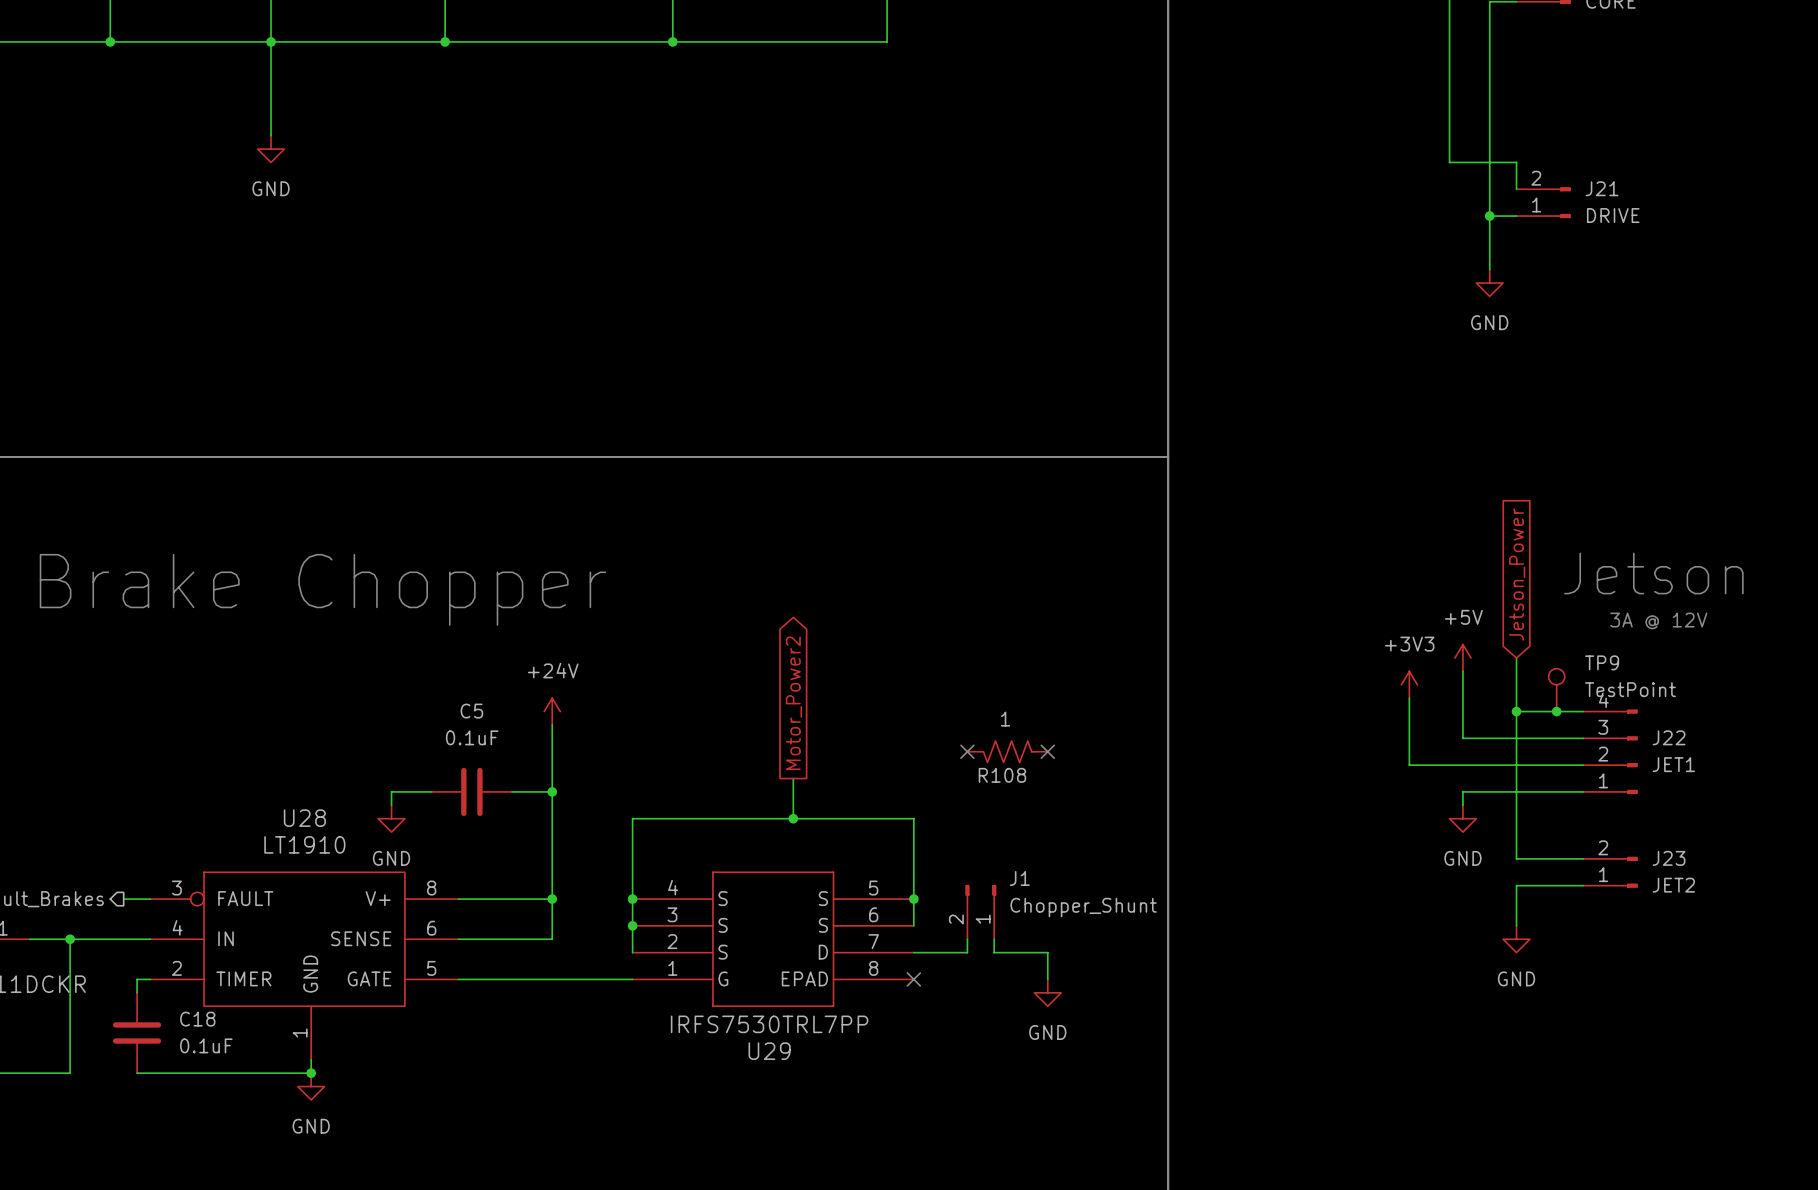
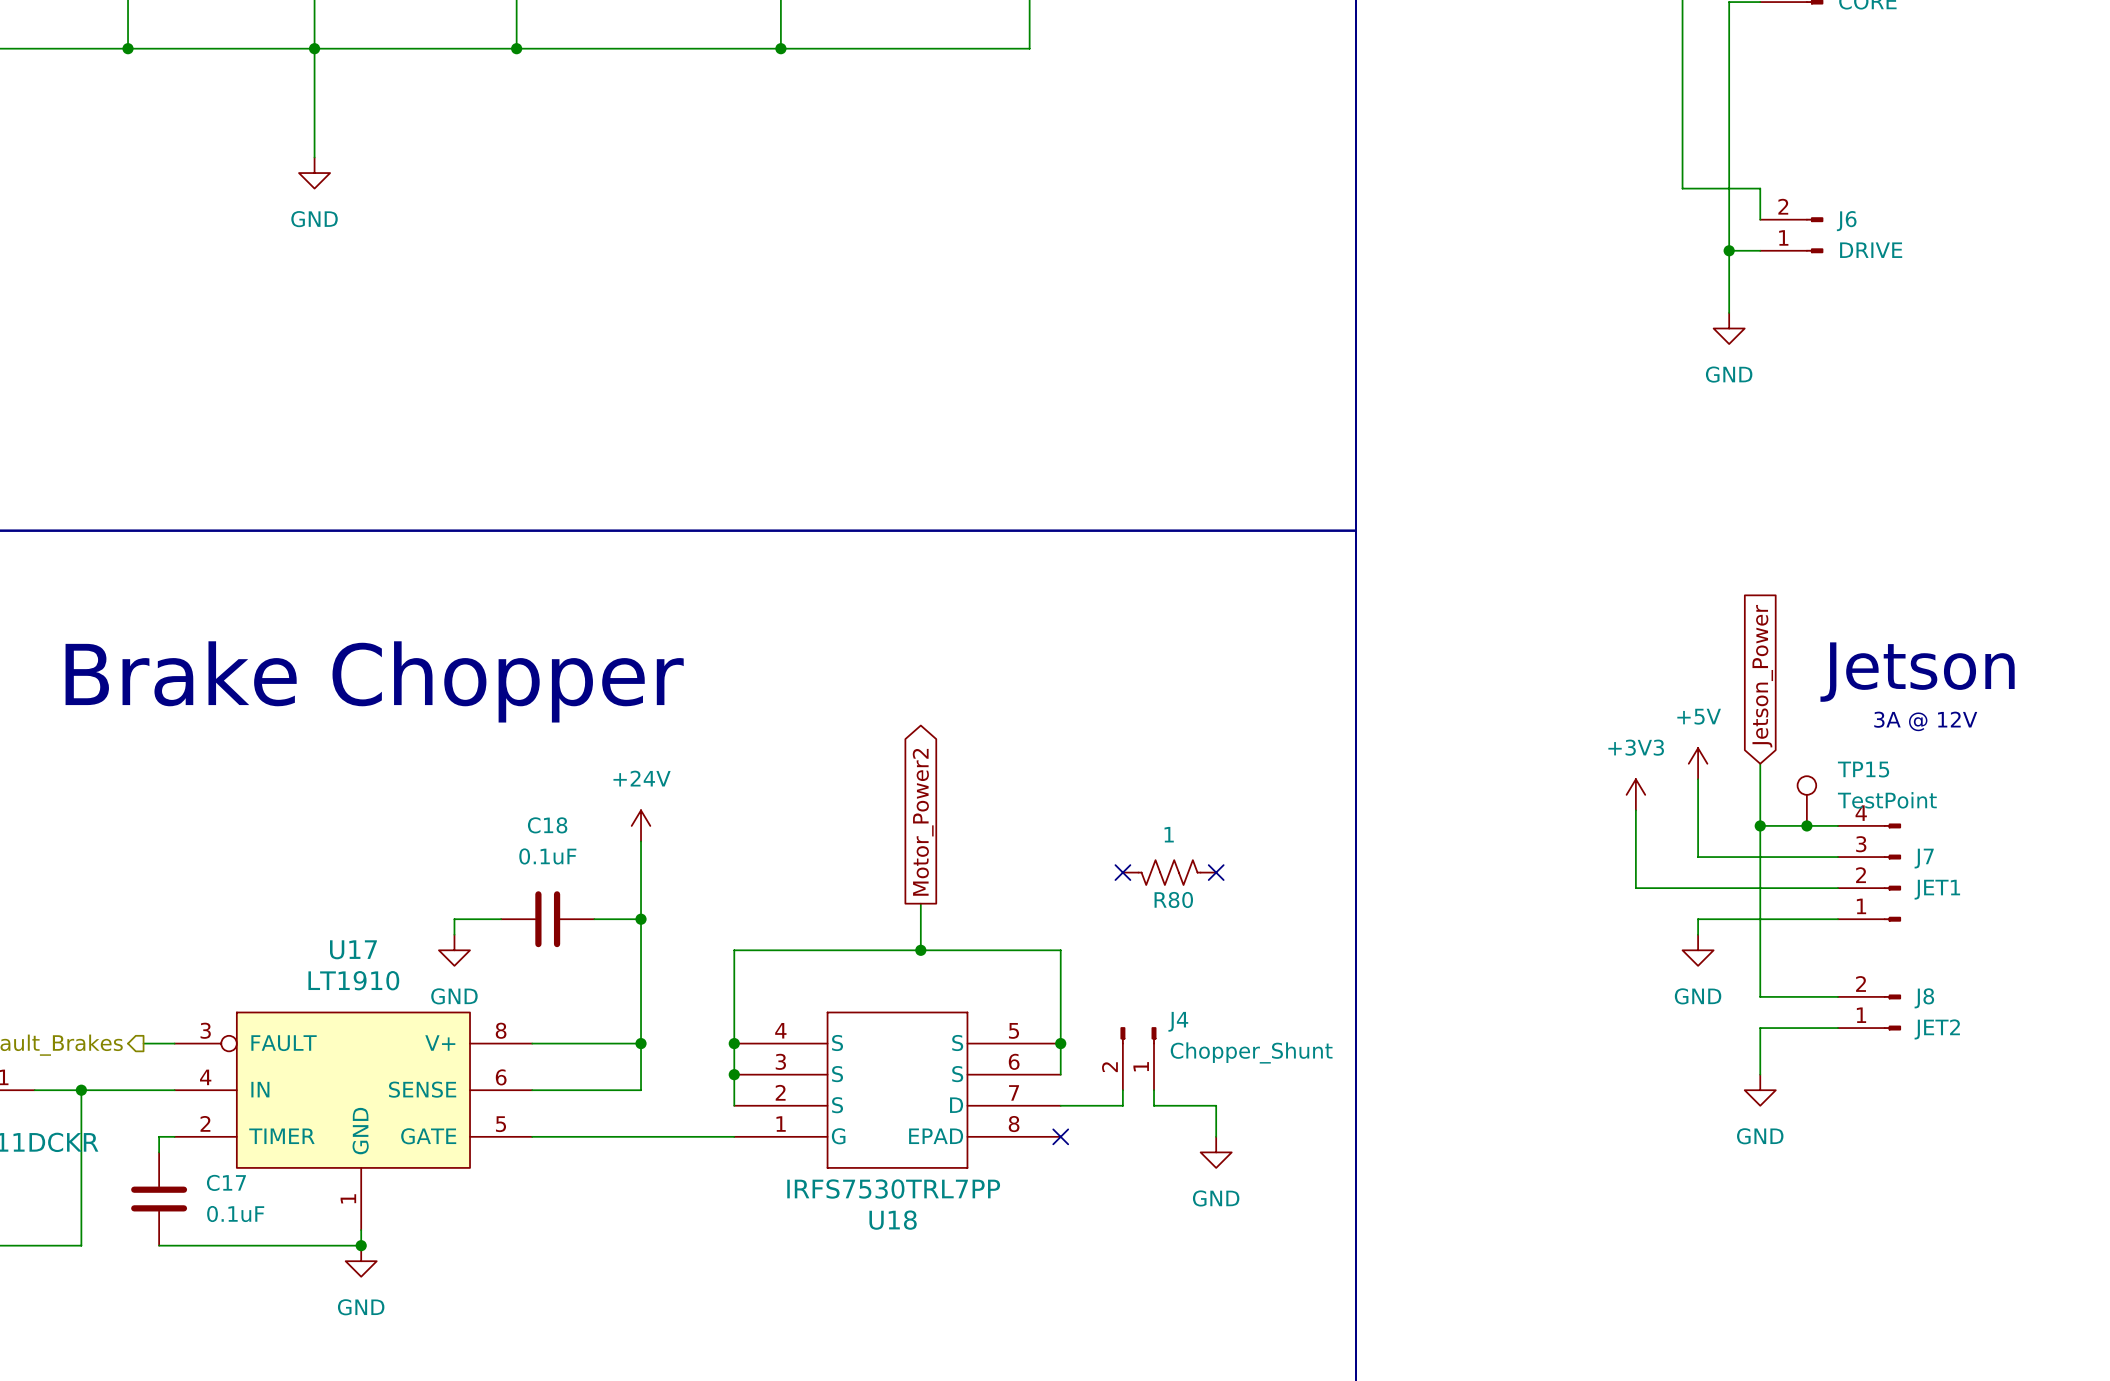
J21 name: J21 (1602, 188) -> J6 (1846, 221)
TP9 name: TP9 (1602, 662) -> TP15 (1863, 769)
C5 name: C5 (471, 711) -> C18 (547, 825)
J22 name: J22 (1669, 737) -> J7 (1924, 858)
R108 name: R108 (1002, 775) -> R80 (1173, 899)
U28 name: U28 (304, 818) -> U17 (353, 949)
J23 name: J23 (1669, 858) -> J8 (1924, 998)
J1 name: J1 (1019, 878) -> J4 (1178, 1021)
C18 name: C18 (197, 1019) -> C17 (226, 1182)
U29 name: U29 (769, 1051) -> U18 (893, 1220)

